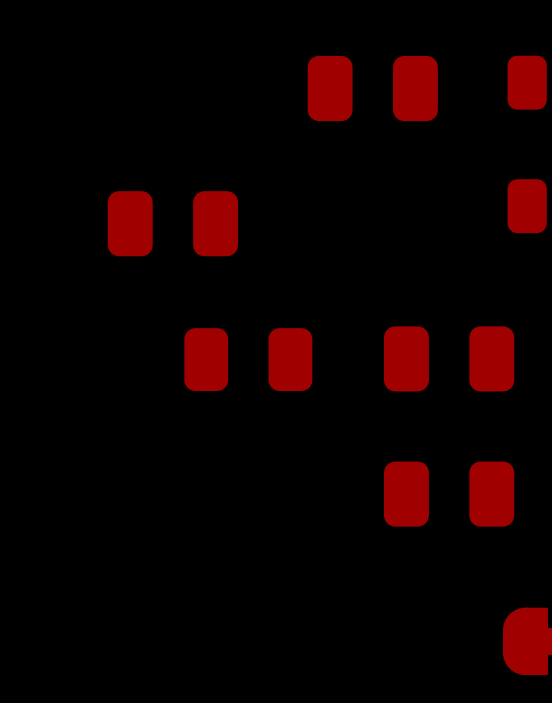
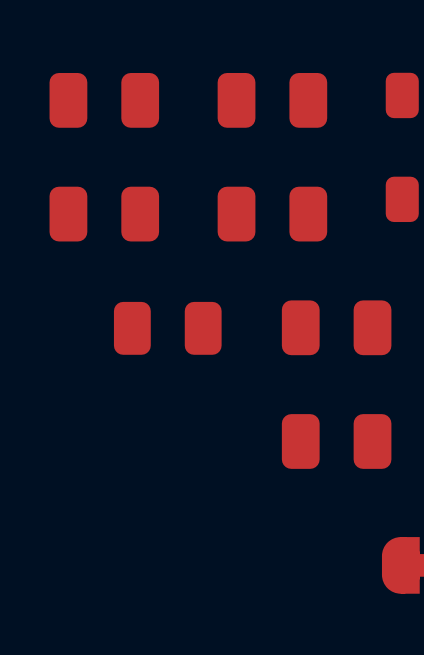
part: none -> (104, 100)
part: none -> (272, 214)

